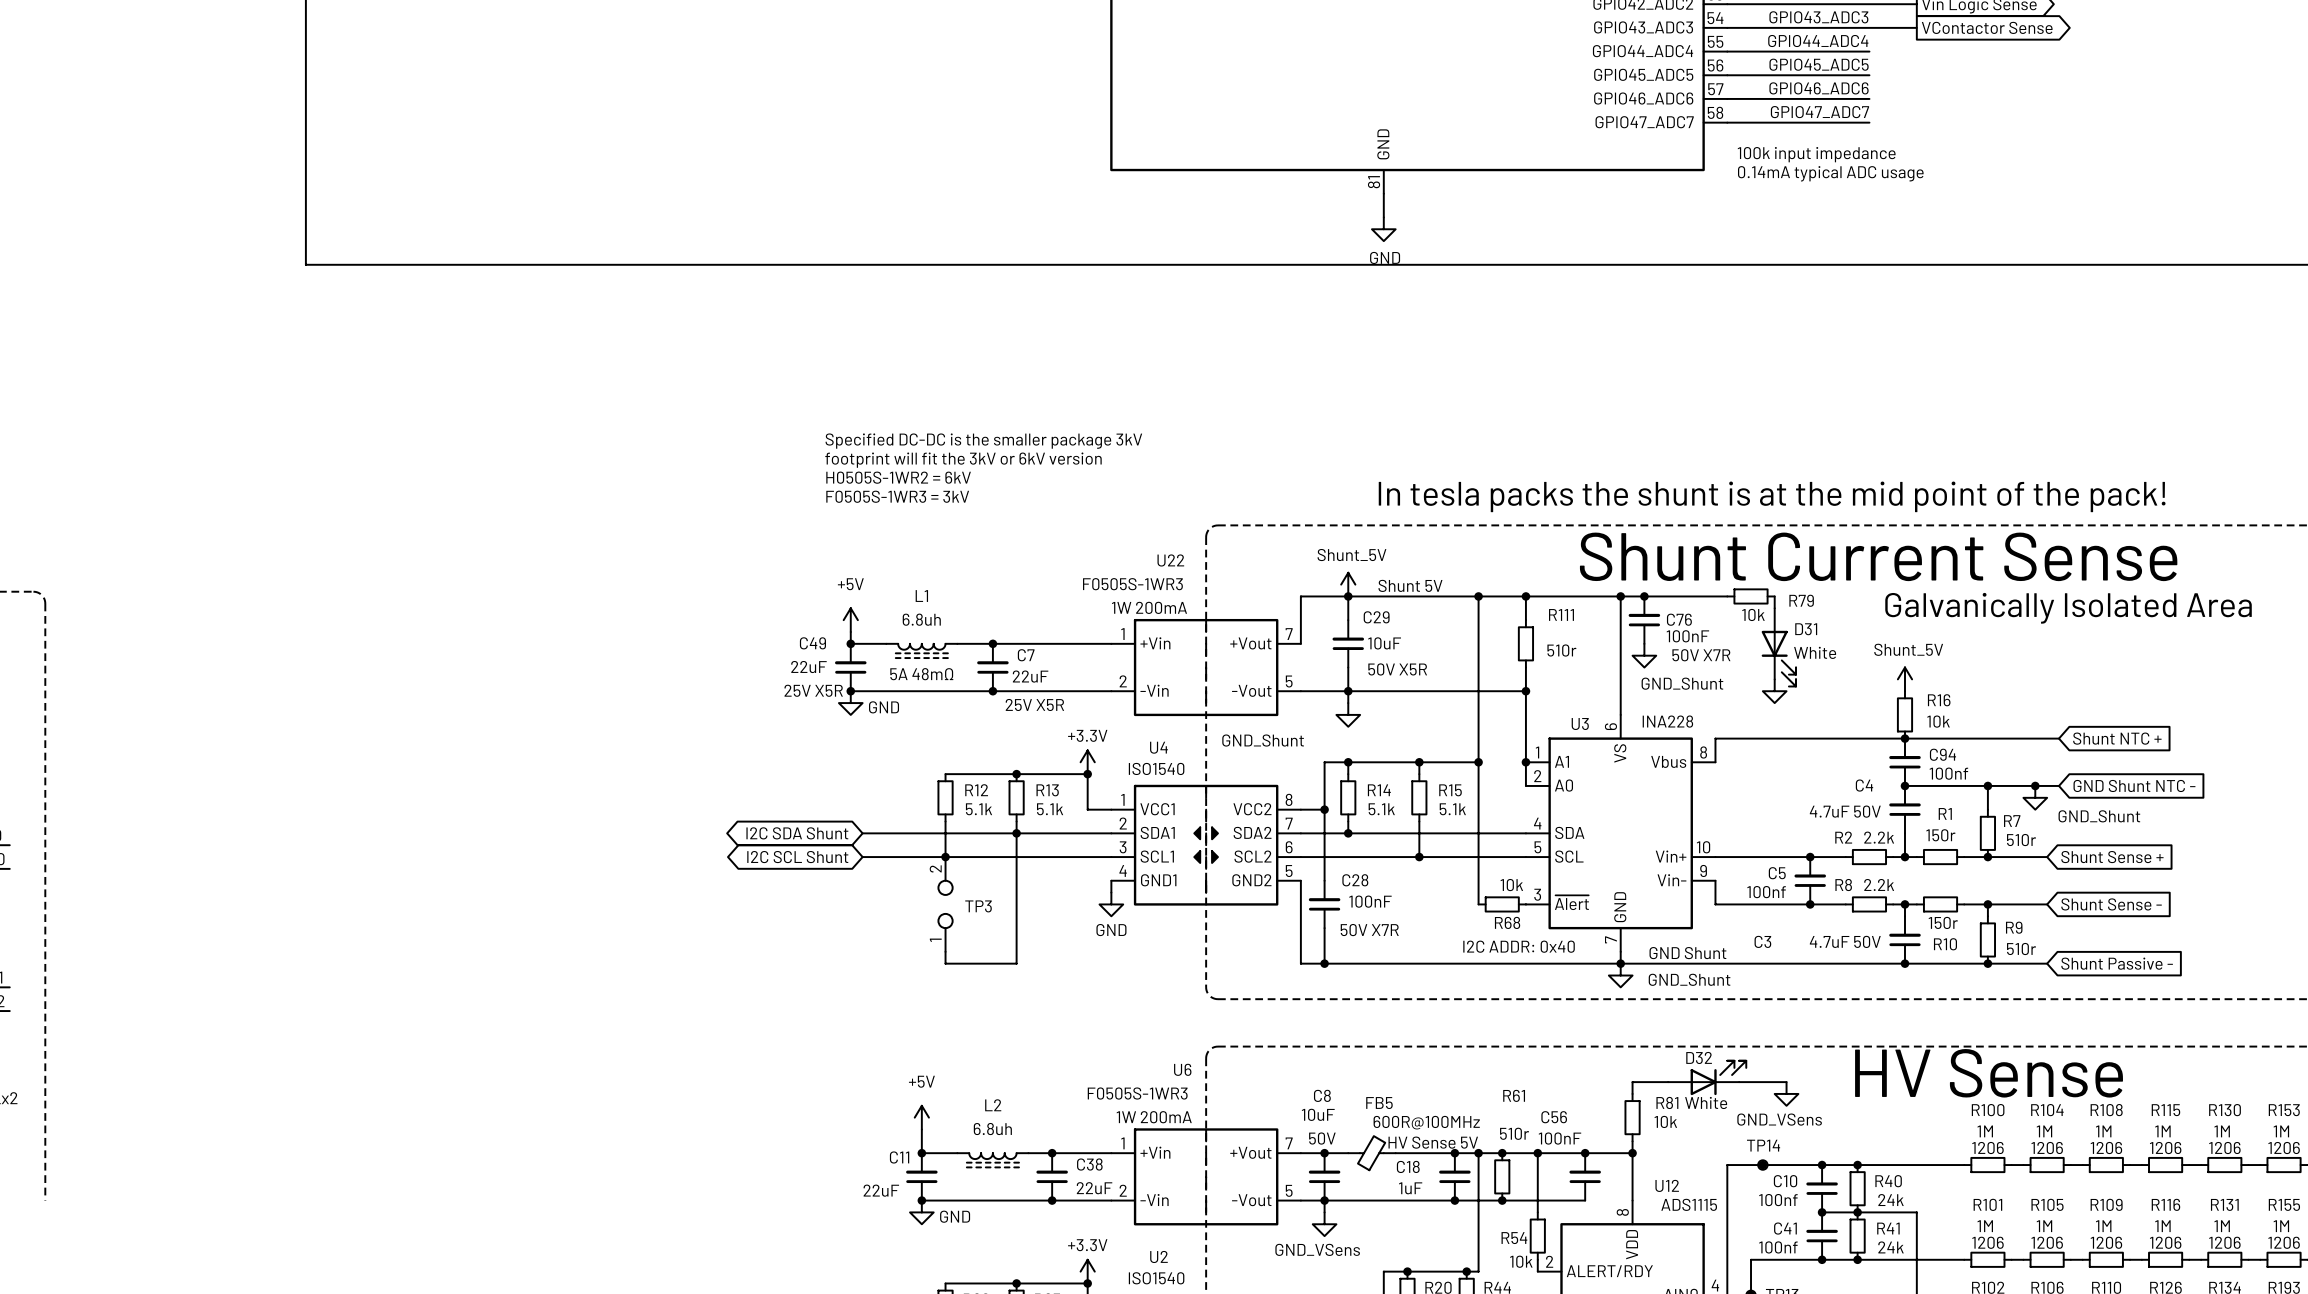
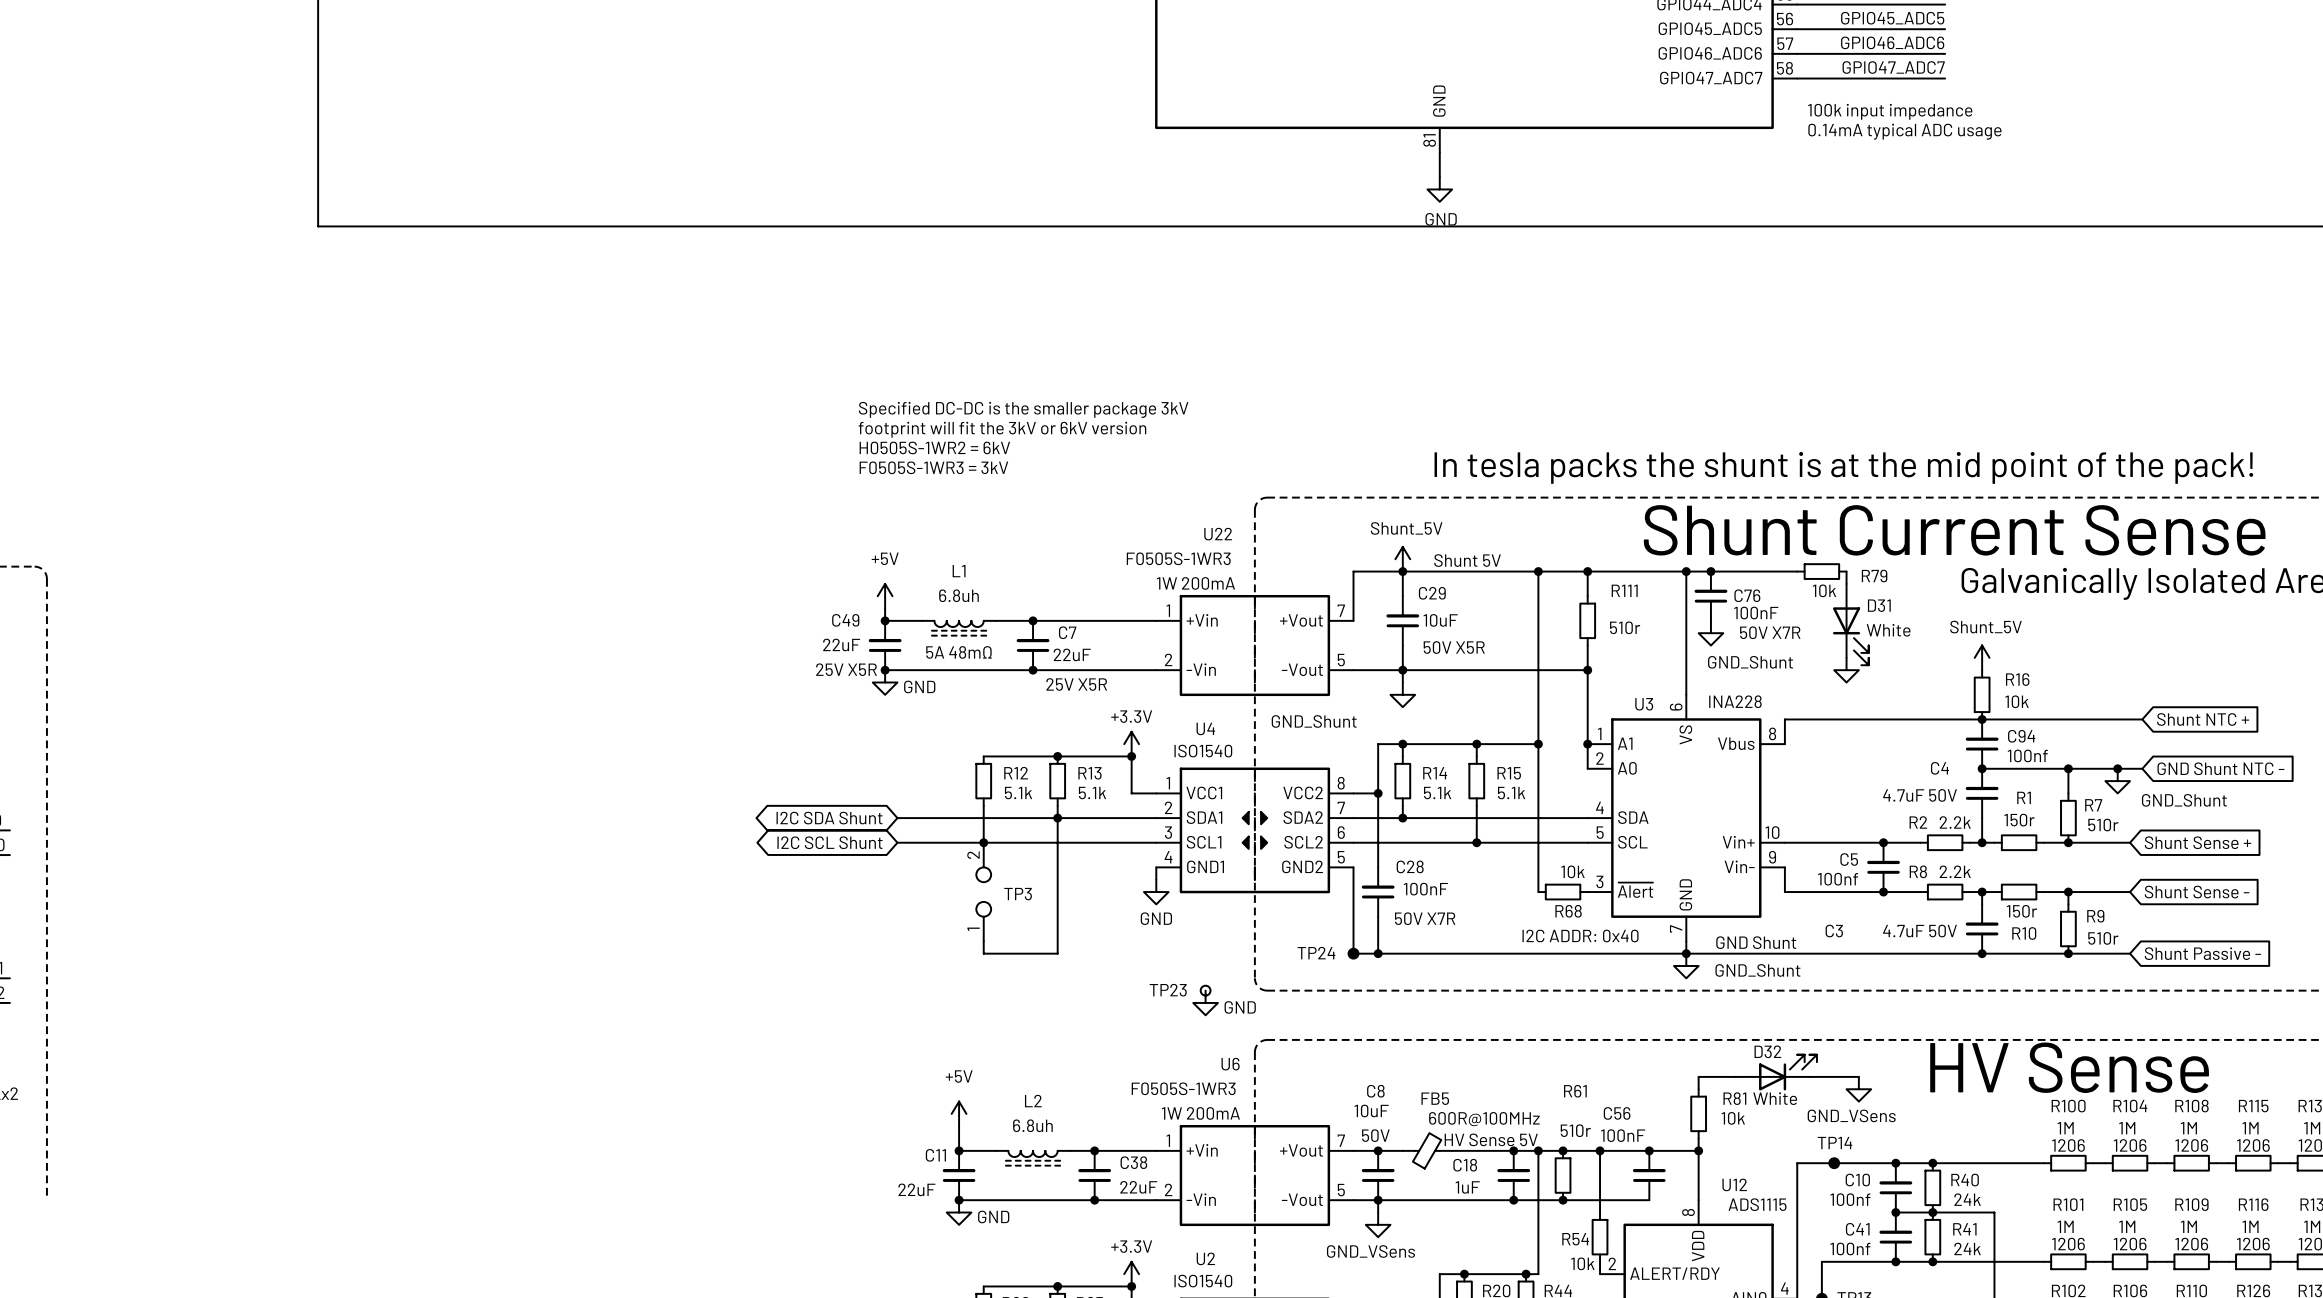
junction: none -> (1353, 953)
TP24: none -> (1353, 953)
TP23: none -> (1205, 990)
power symbol: none -> GND (1205, 1002)

